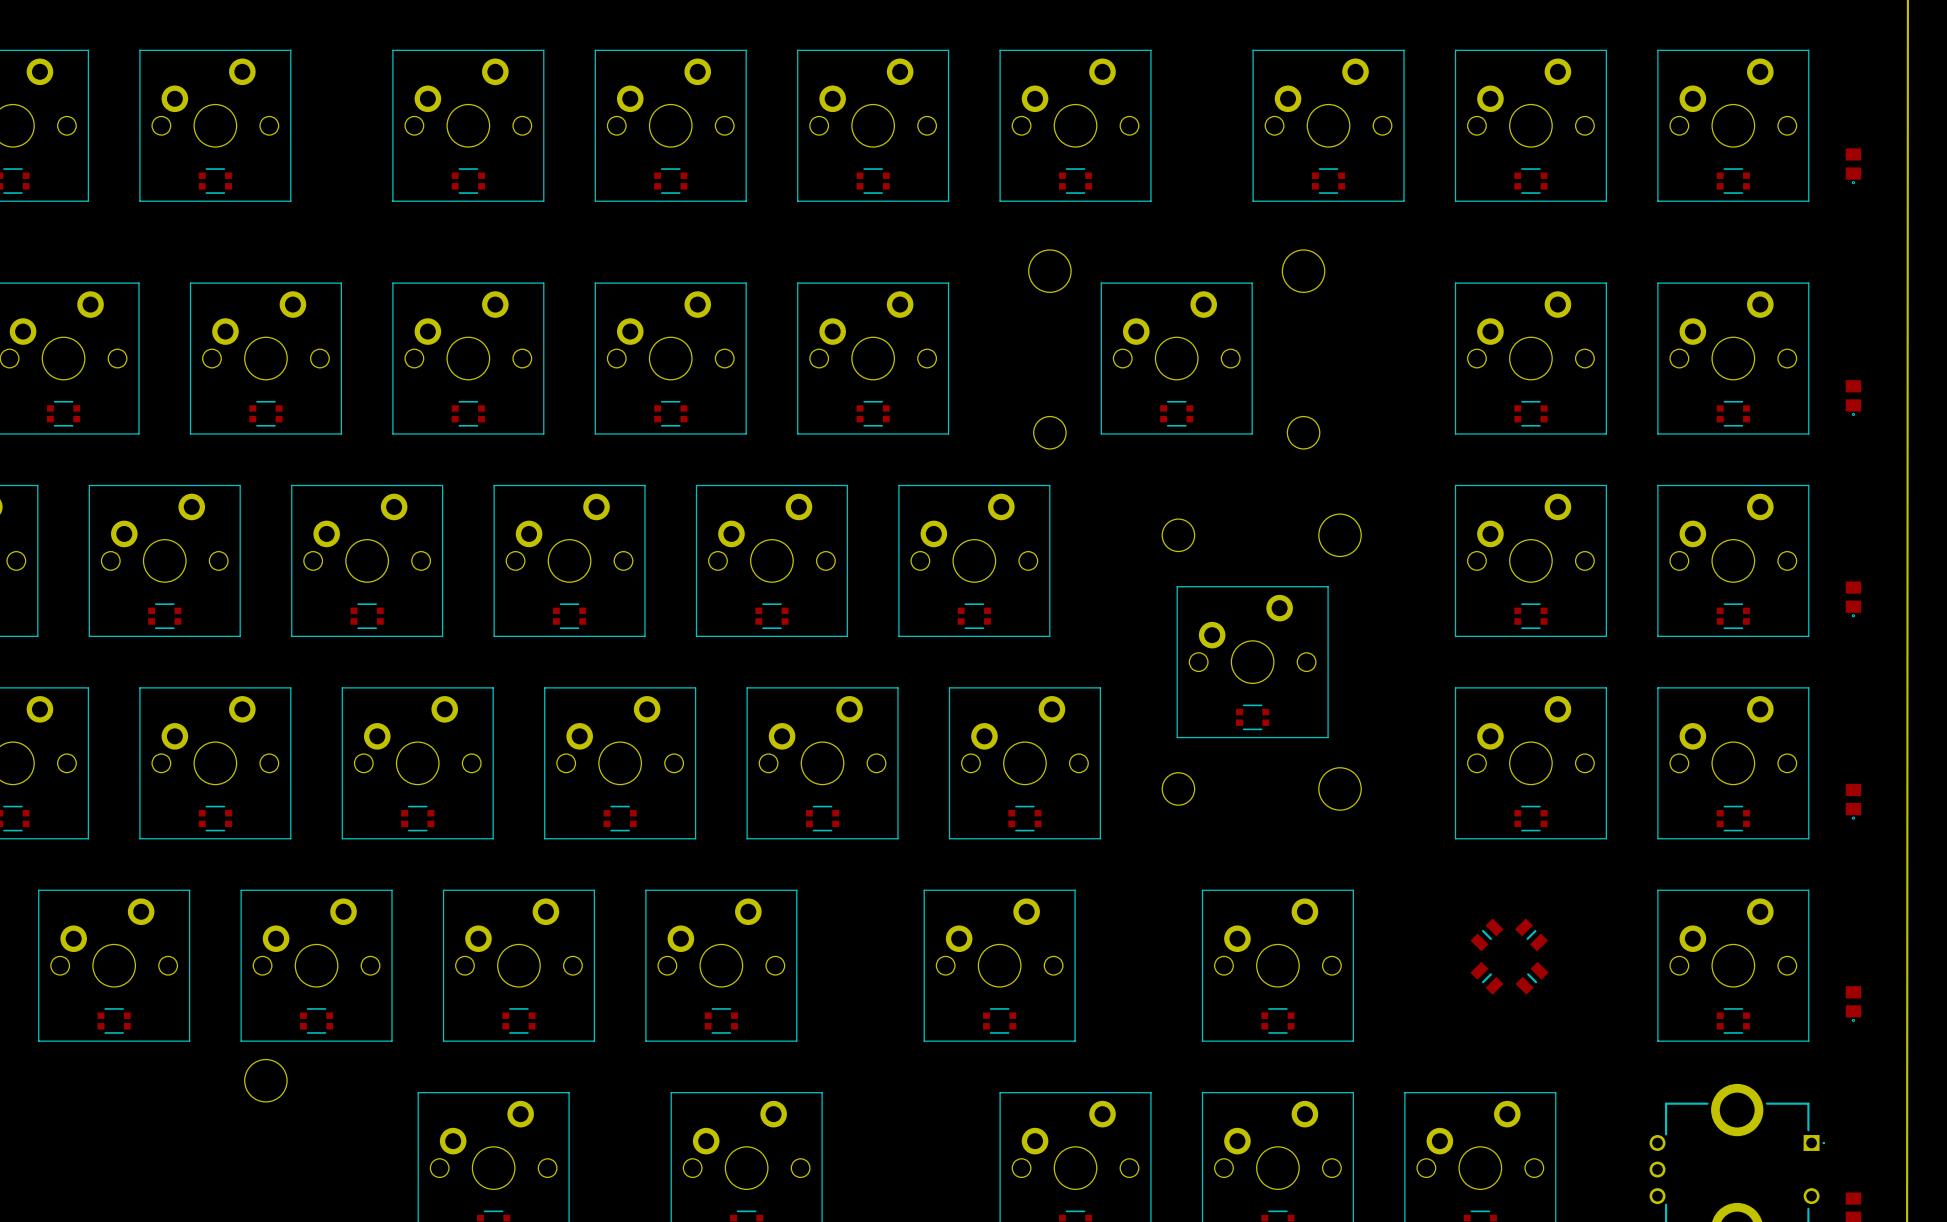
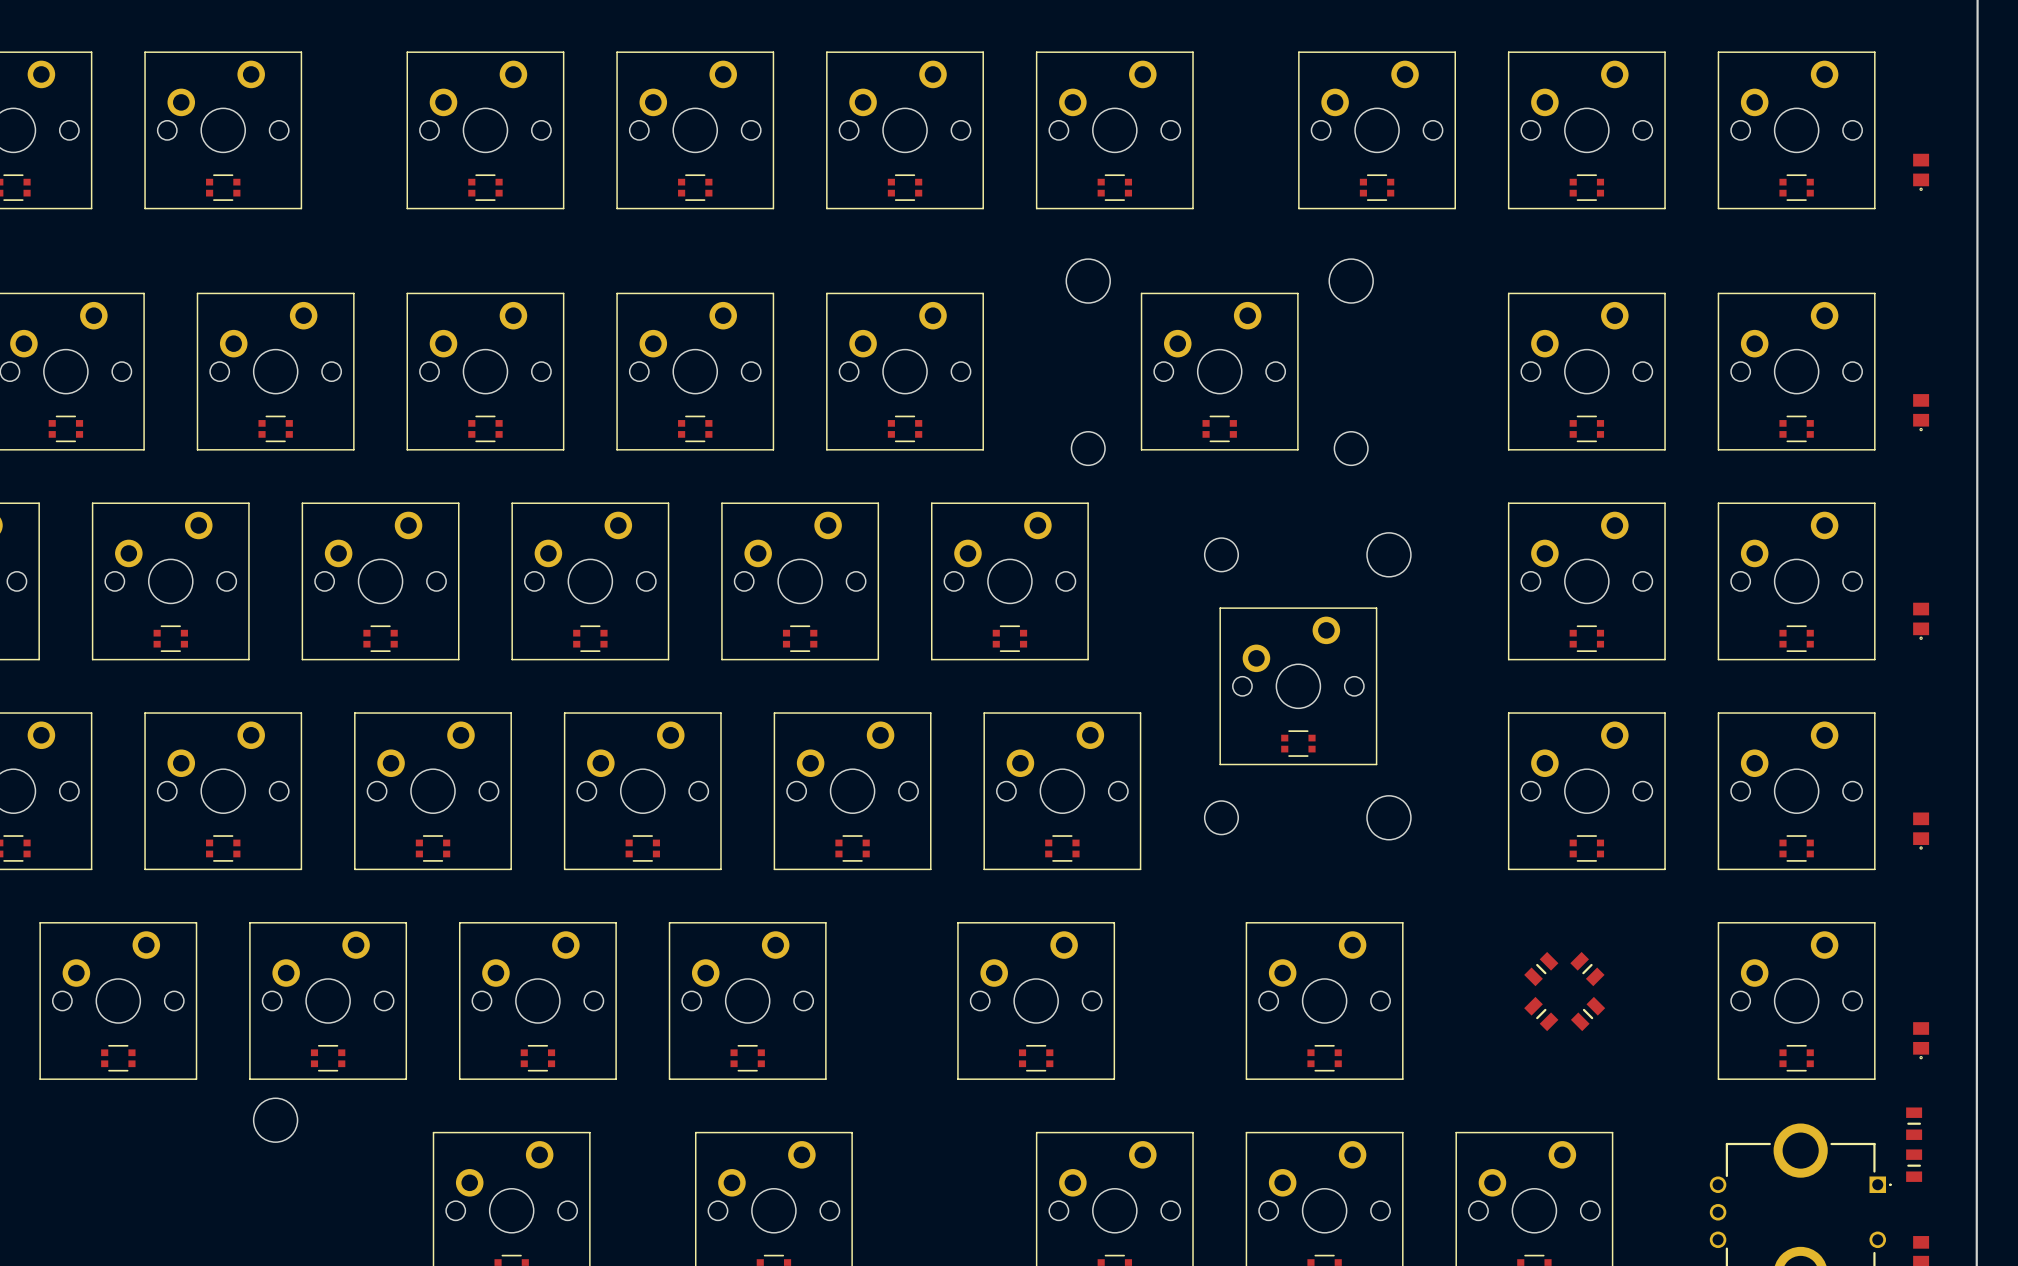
part: none -> (1914, 1123)
part: none -> (1914, 1165)

